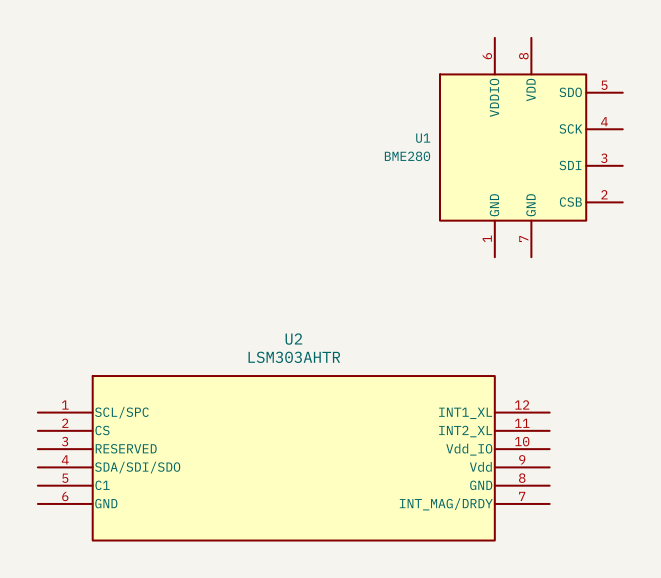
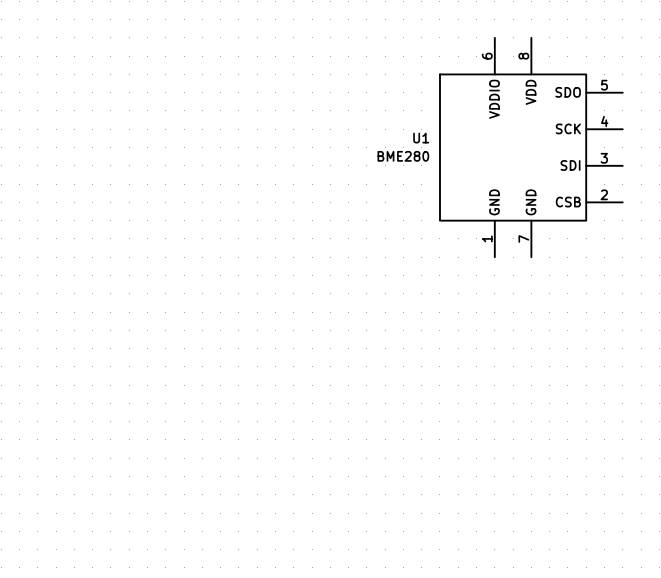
U2: LSM303AHTR (293, 458) -> none

